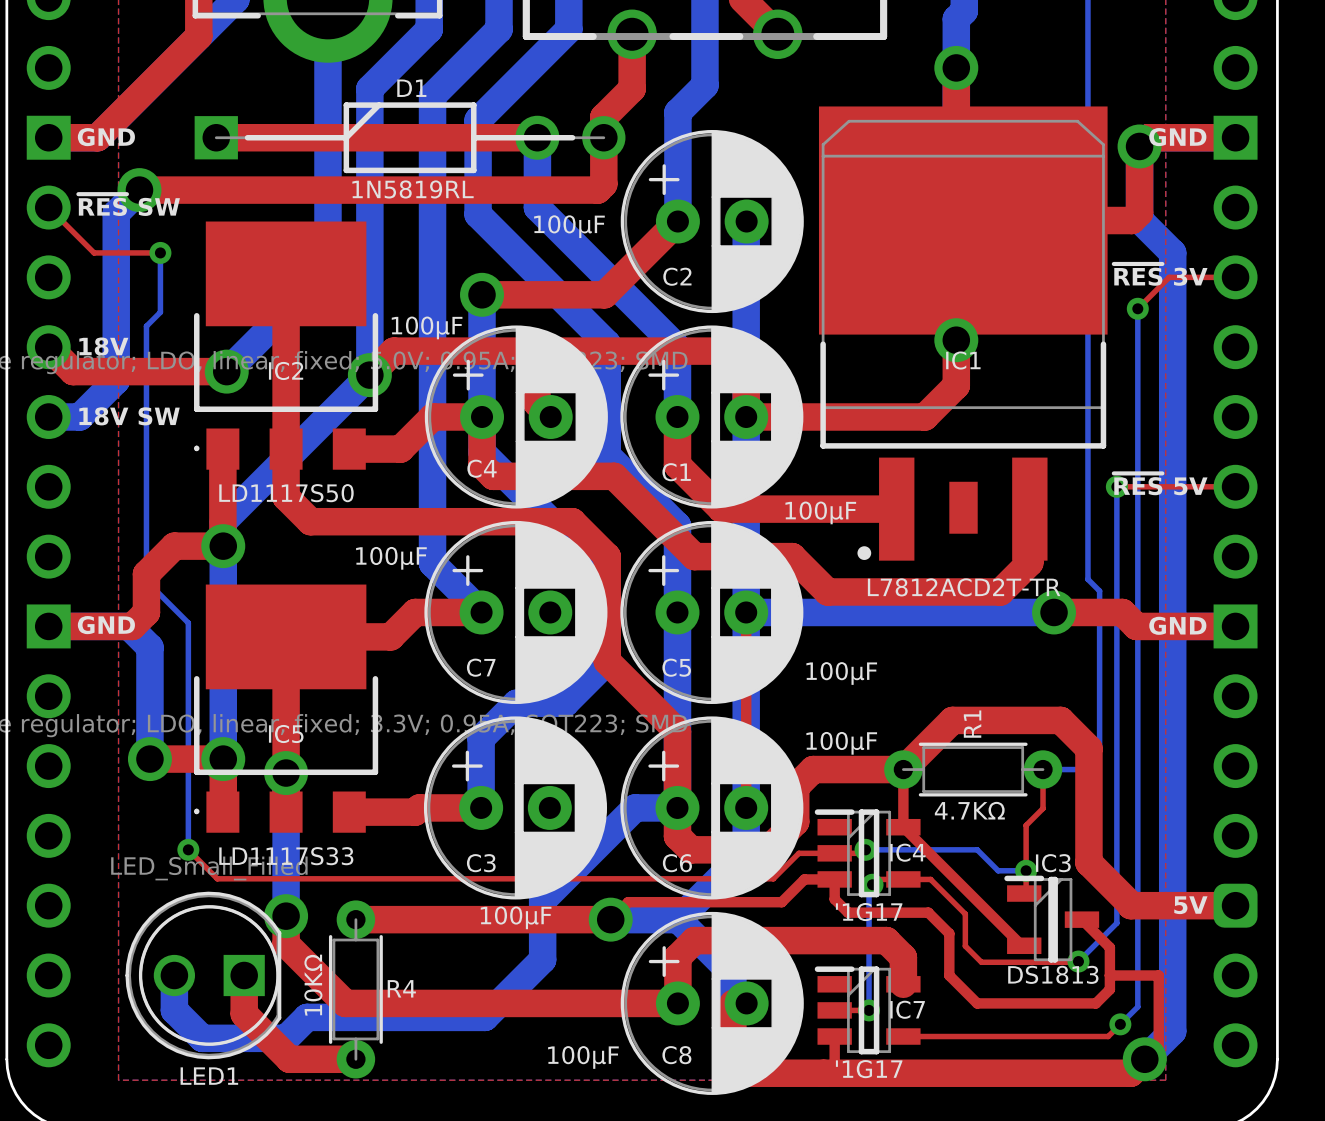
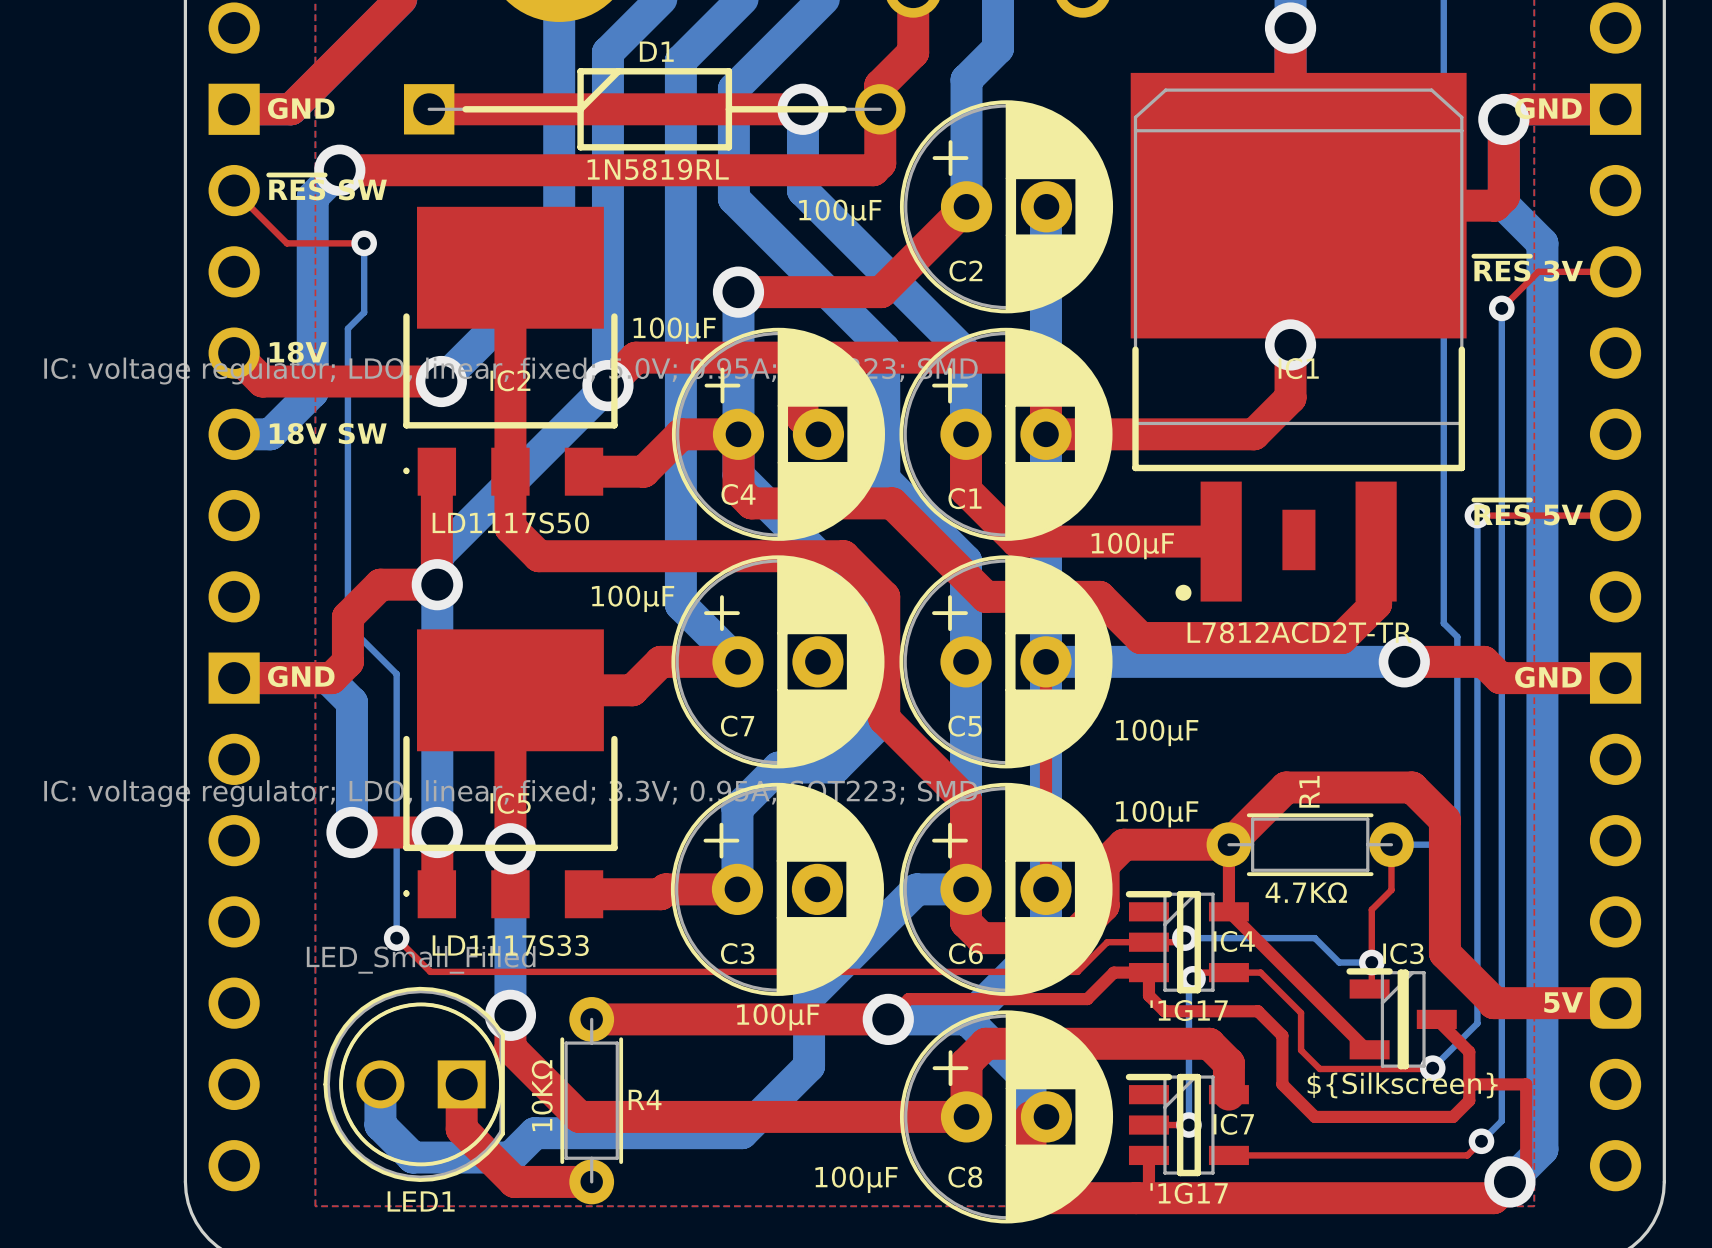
IC3 text: DS1813 (1053, 974) -> ${Silkscreen} (1402, 1085)

